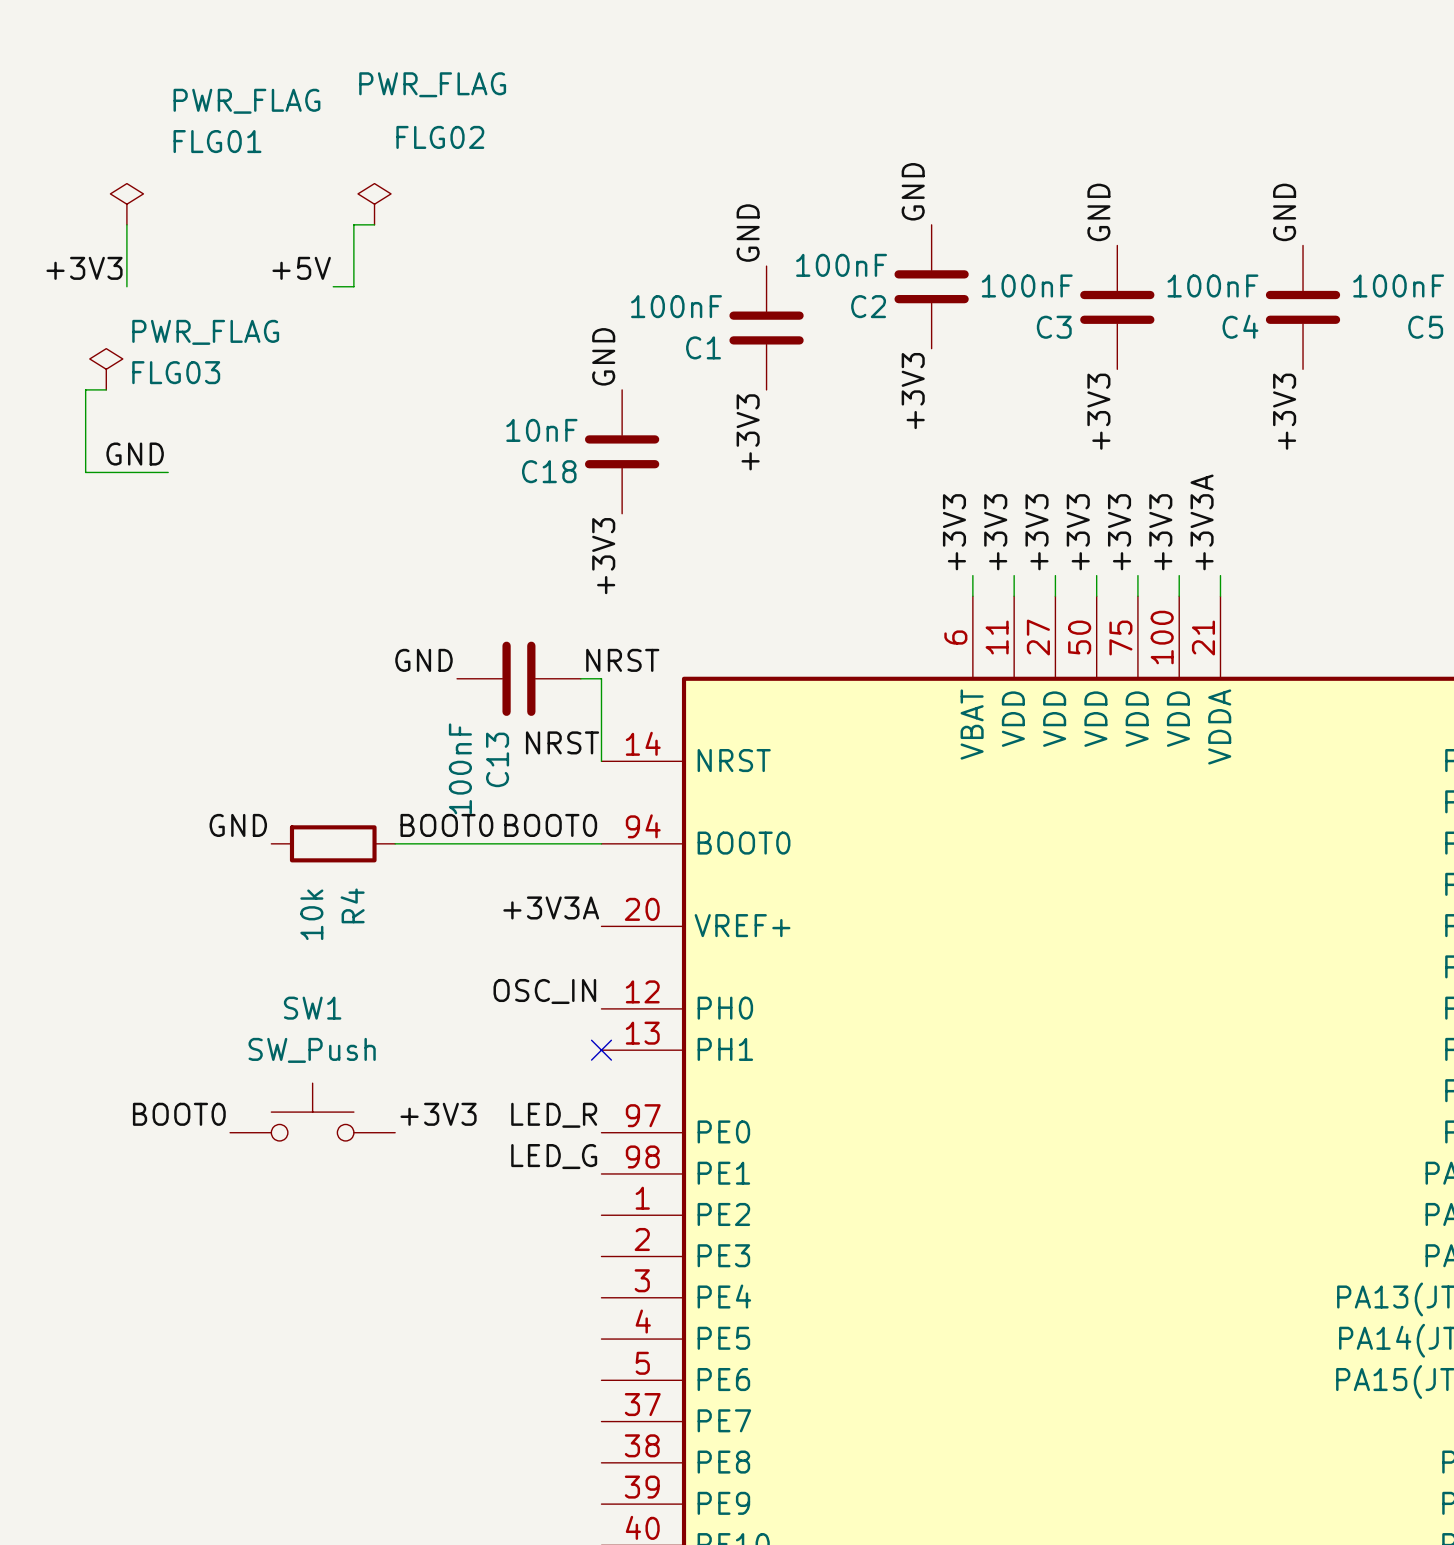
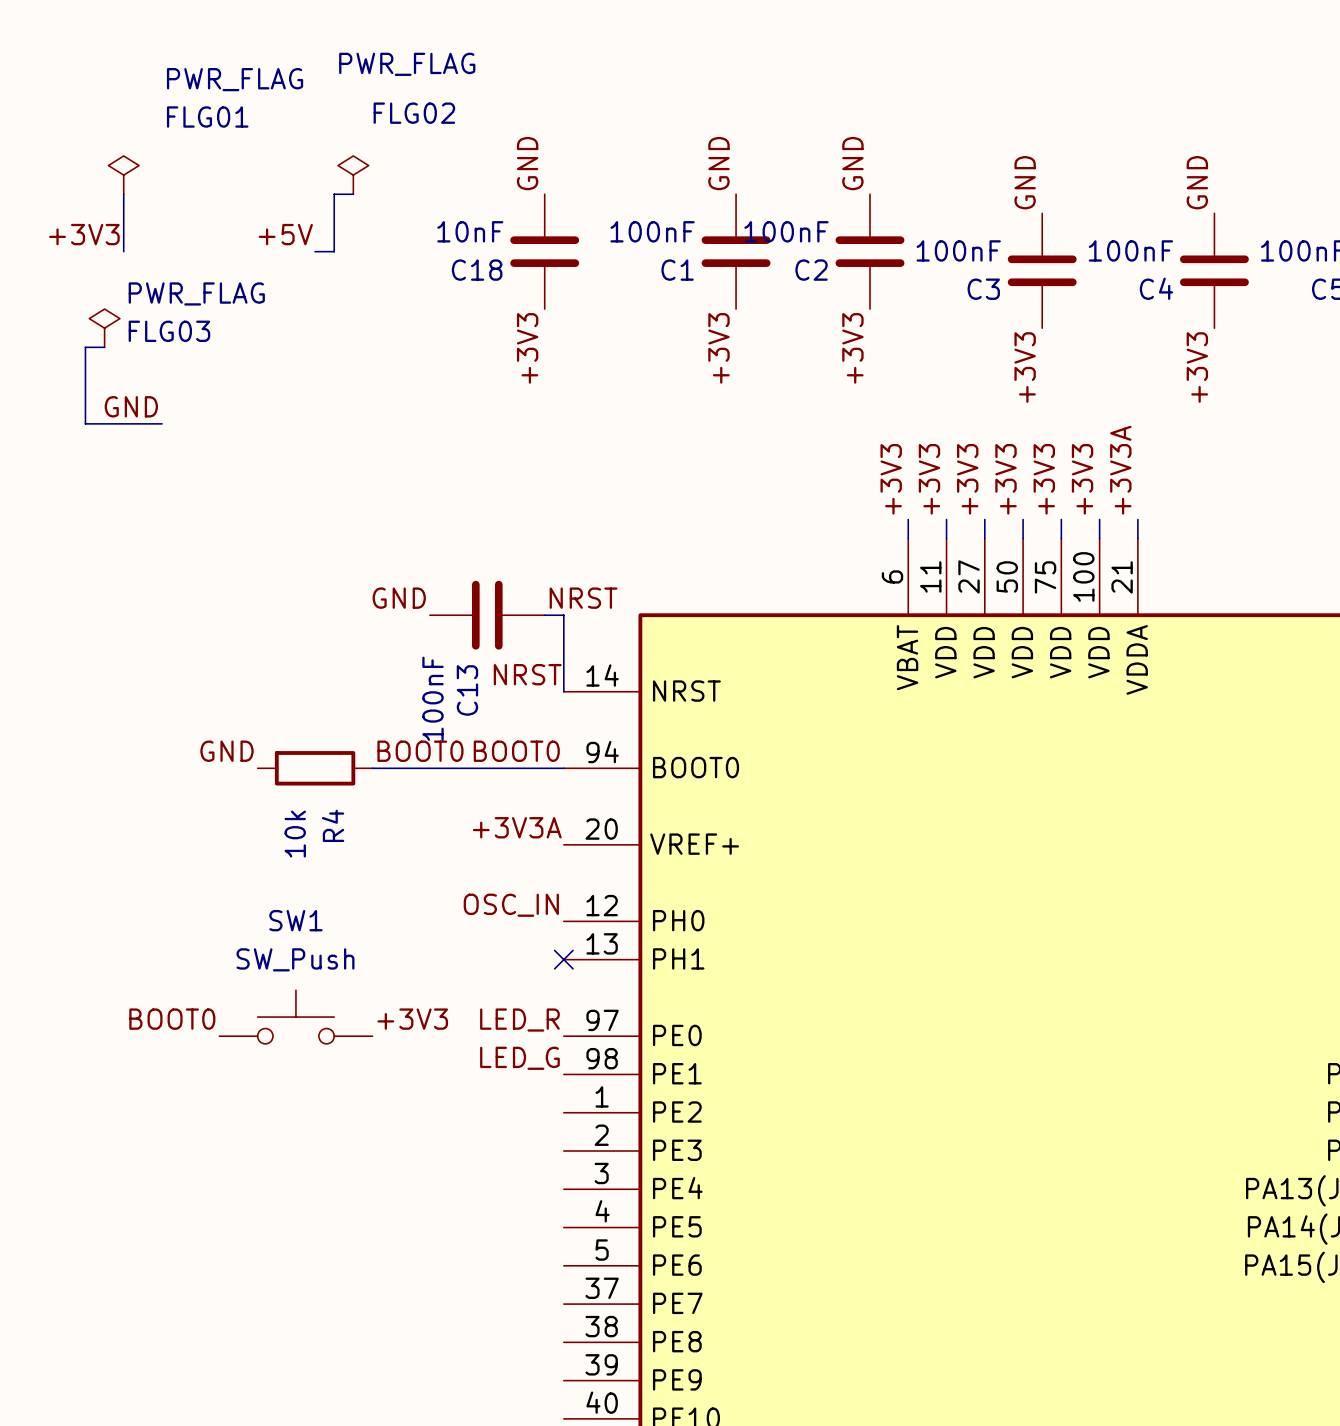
label: none -> GND (527, 163)
label position: GND (748, 233) -> GND (718, 163)
C1 position: (766, 328) -> (736, 251)
label: GND (603, 356) -> none
label: none -> +3V3 (527, 348)
label position: +3V3 (748, 432) -> +3V3 (718, 348)
C18 position: (622, 451) -> (544, 251)
label: +3V3 (603, 556) -> none

